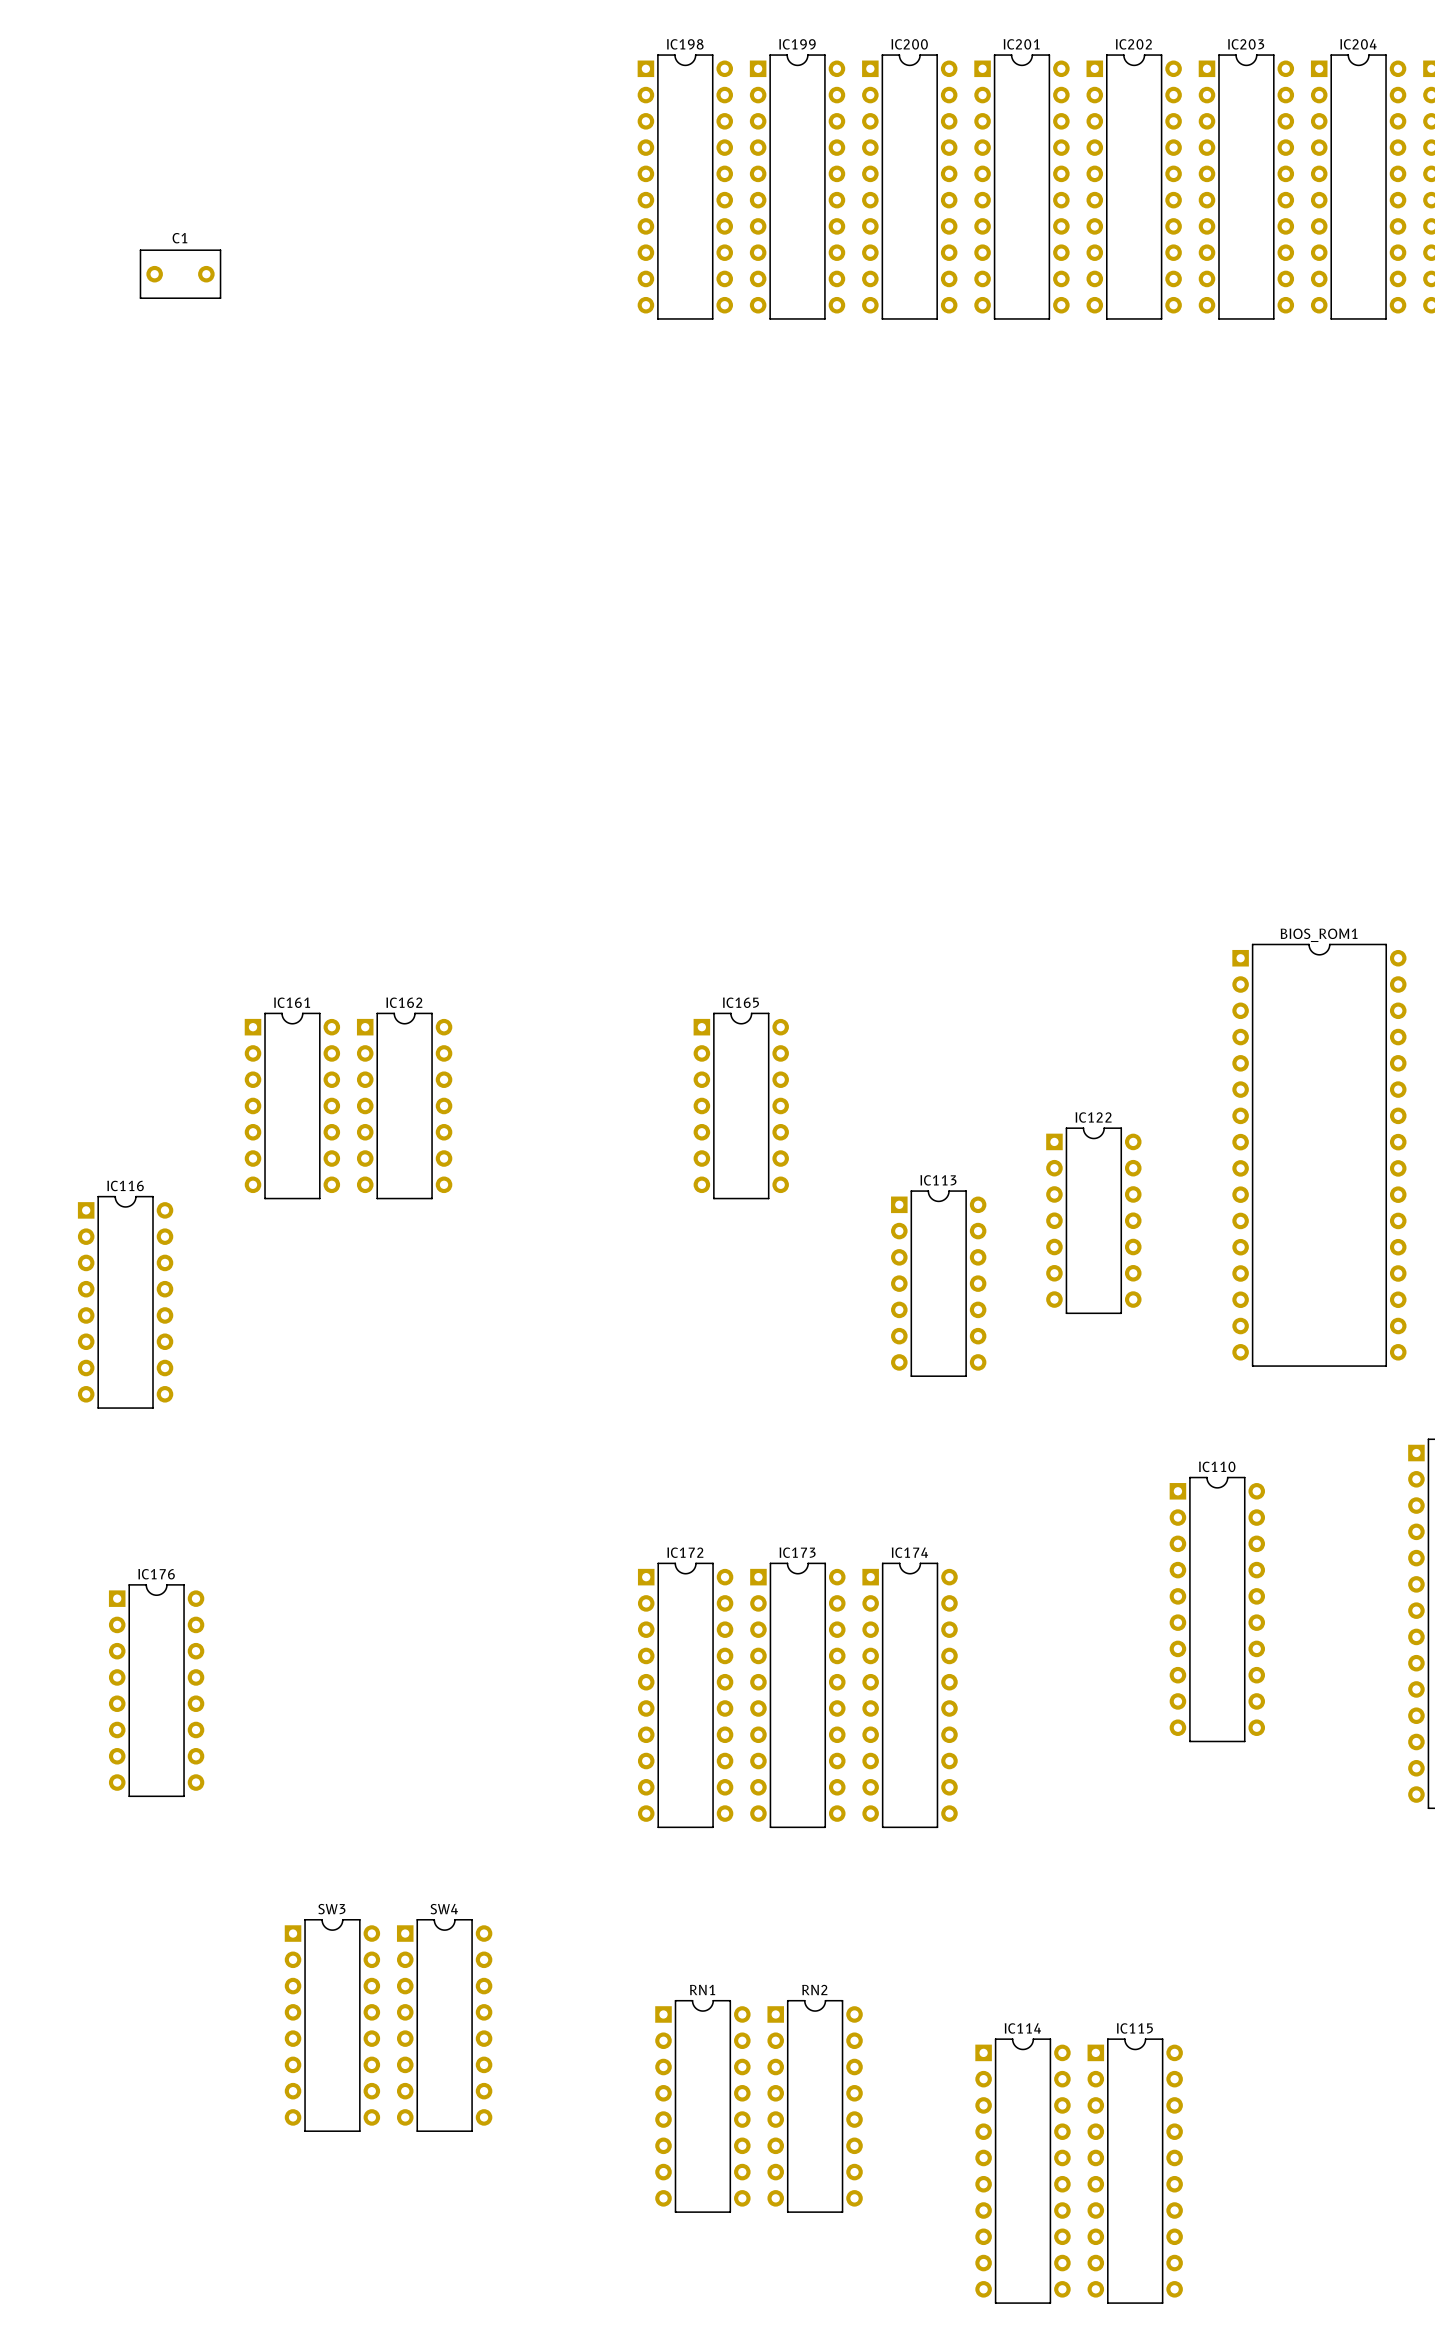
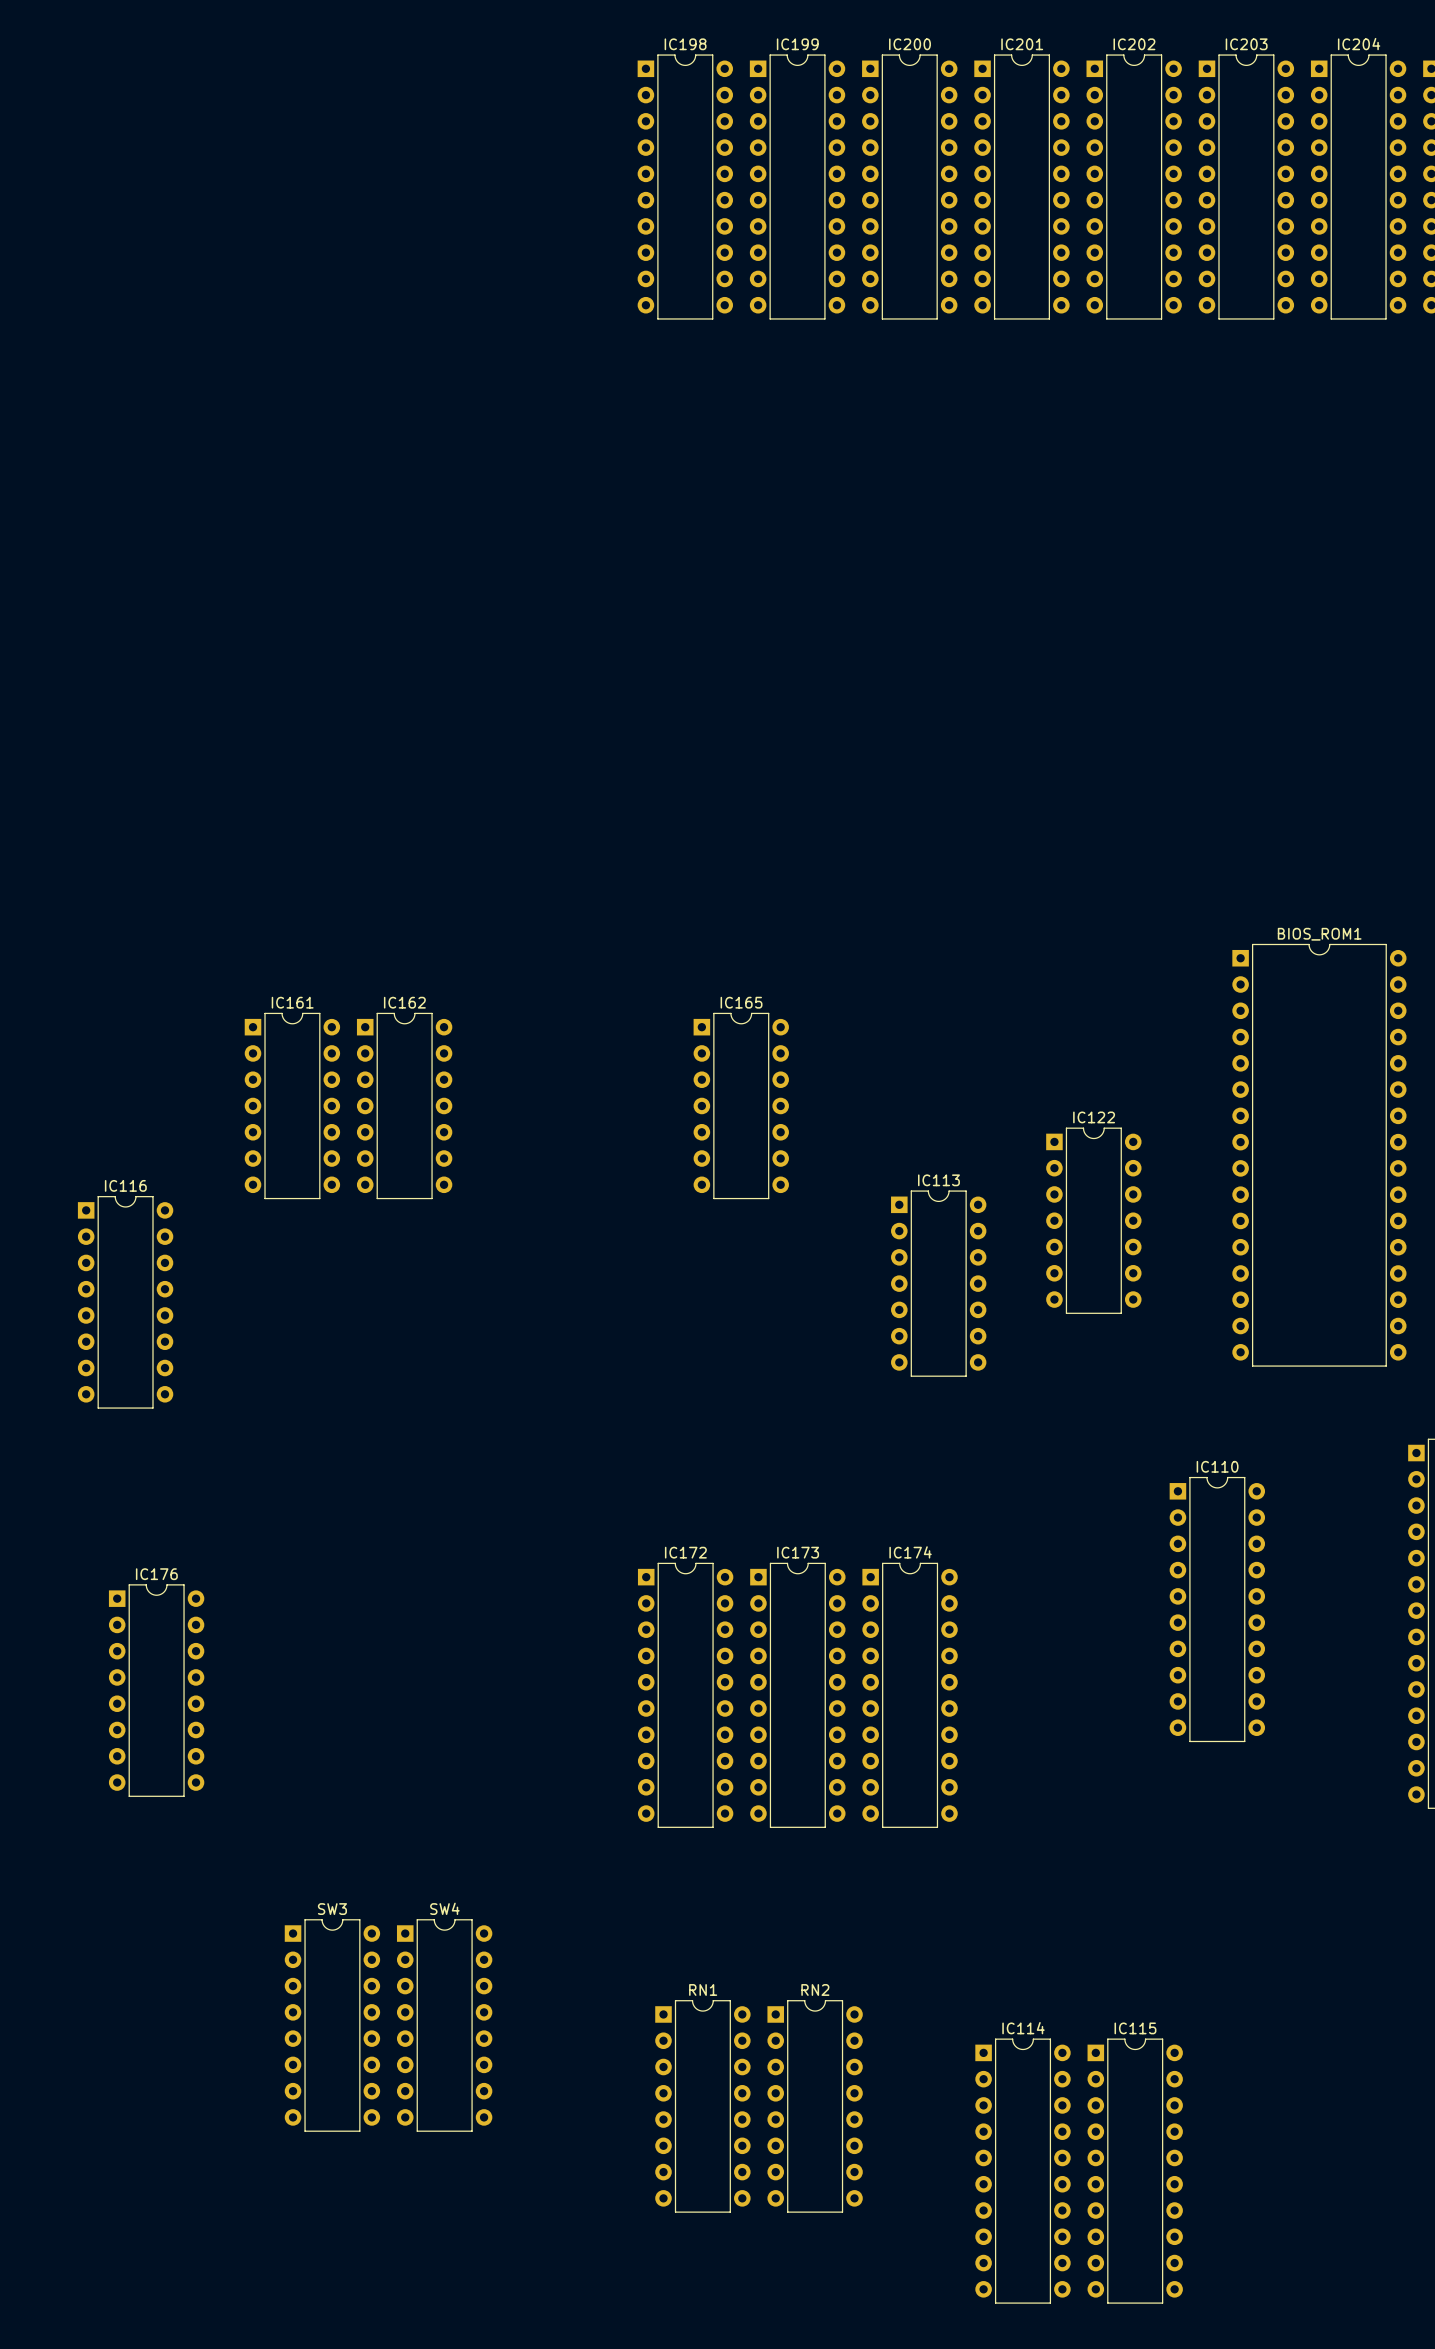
C1: (180, 274) -> none

